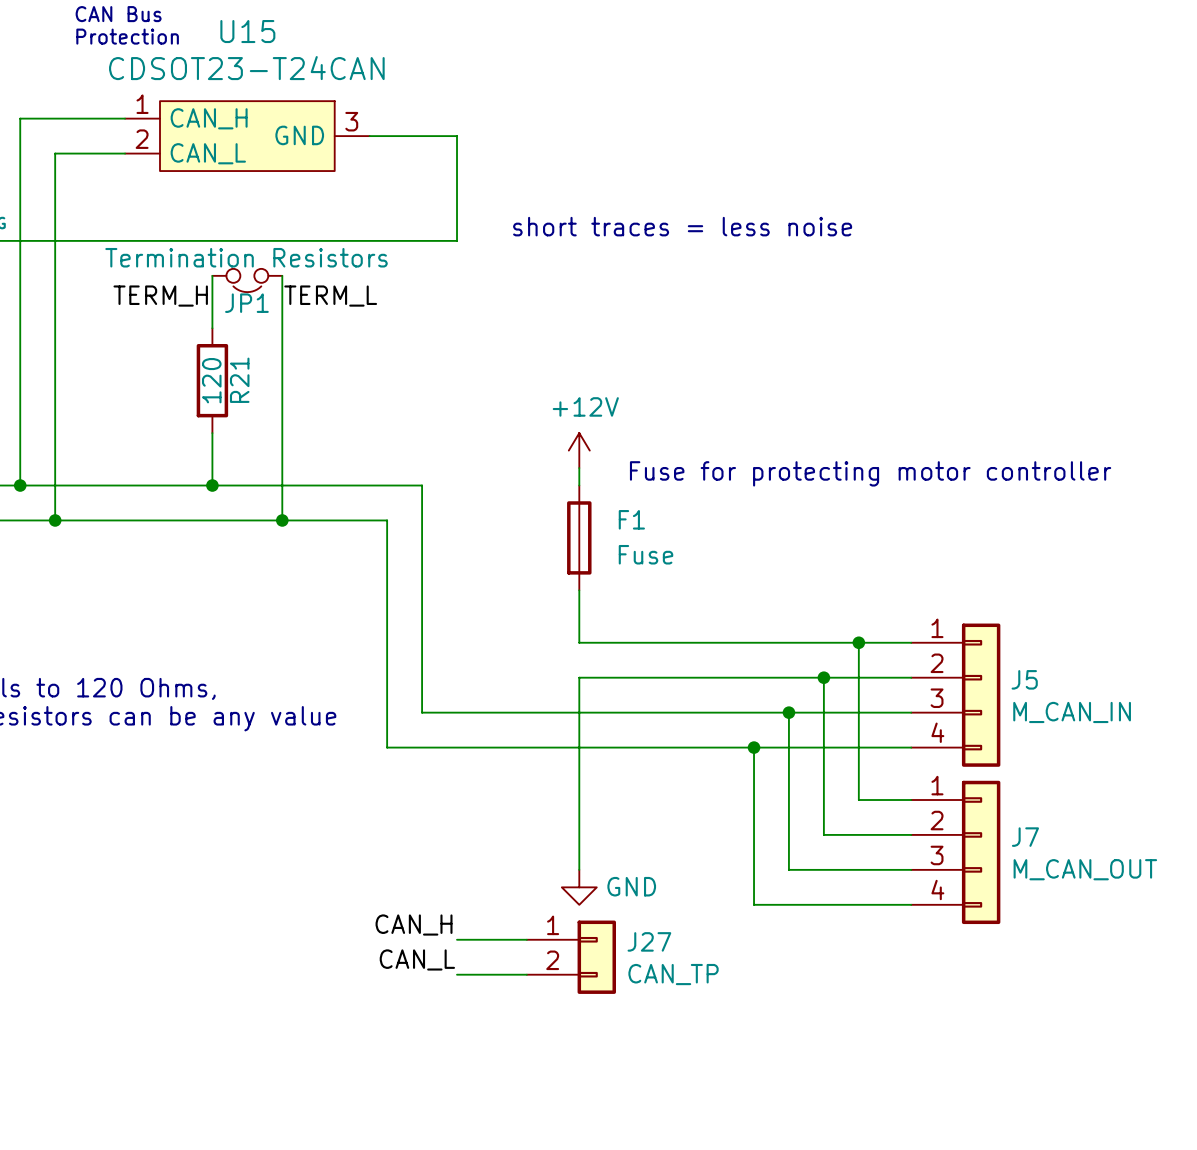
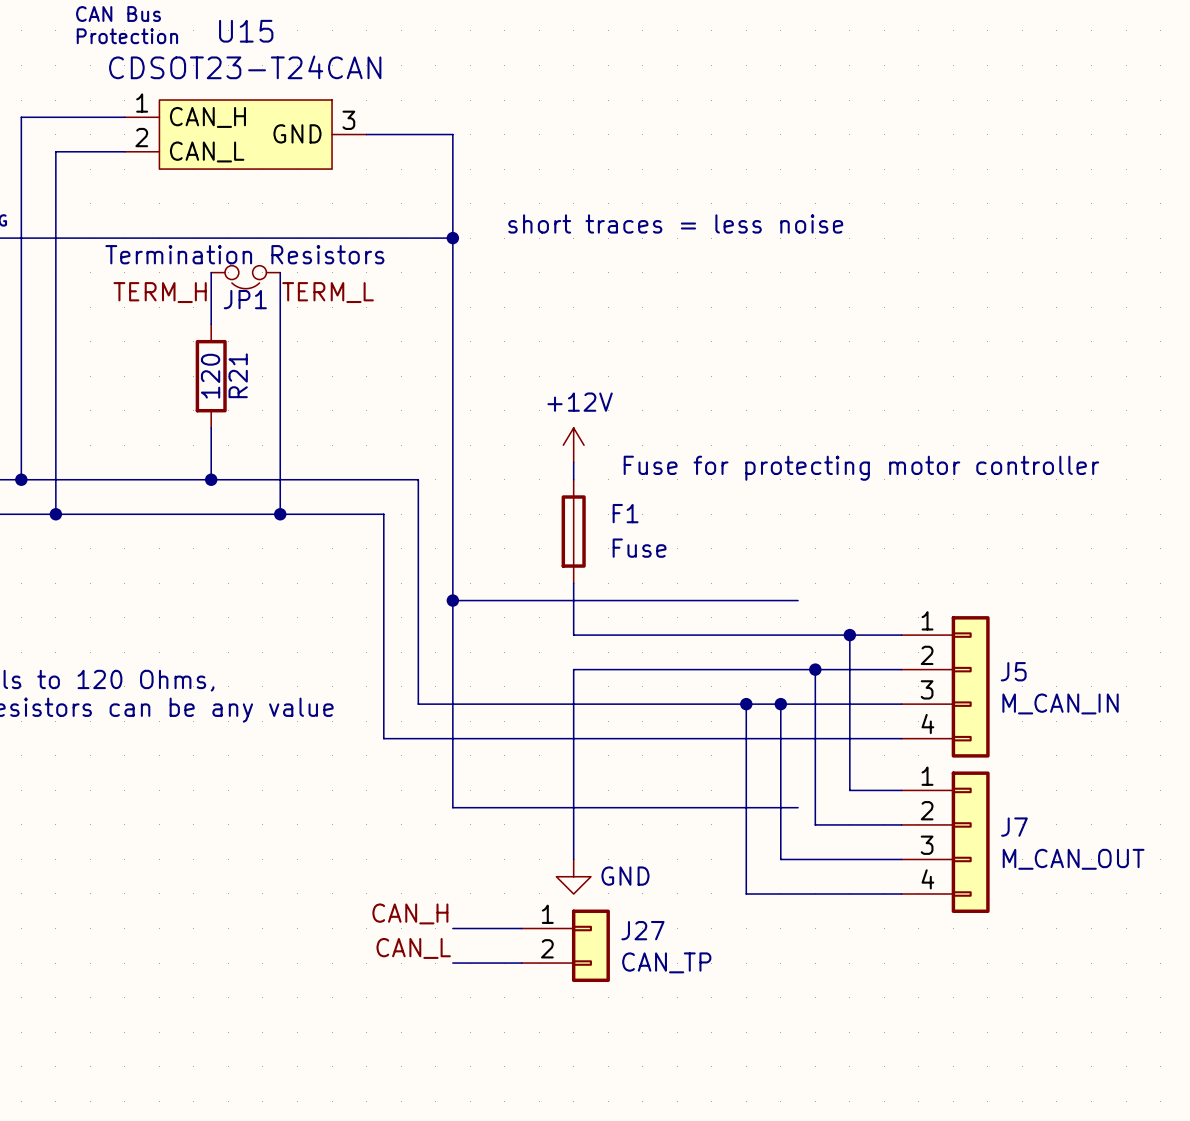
wire: none -> (452, 238) (452, 807) (798, 807)
junction: none -> (452, 238)
wire: none -> (452, 600) (798, 600)
junction: none -> (452, 600)
wire: none -> (746, 704) (746, 738)
junction position: (754, 747) -> (746, 704)

